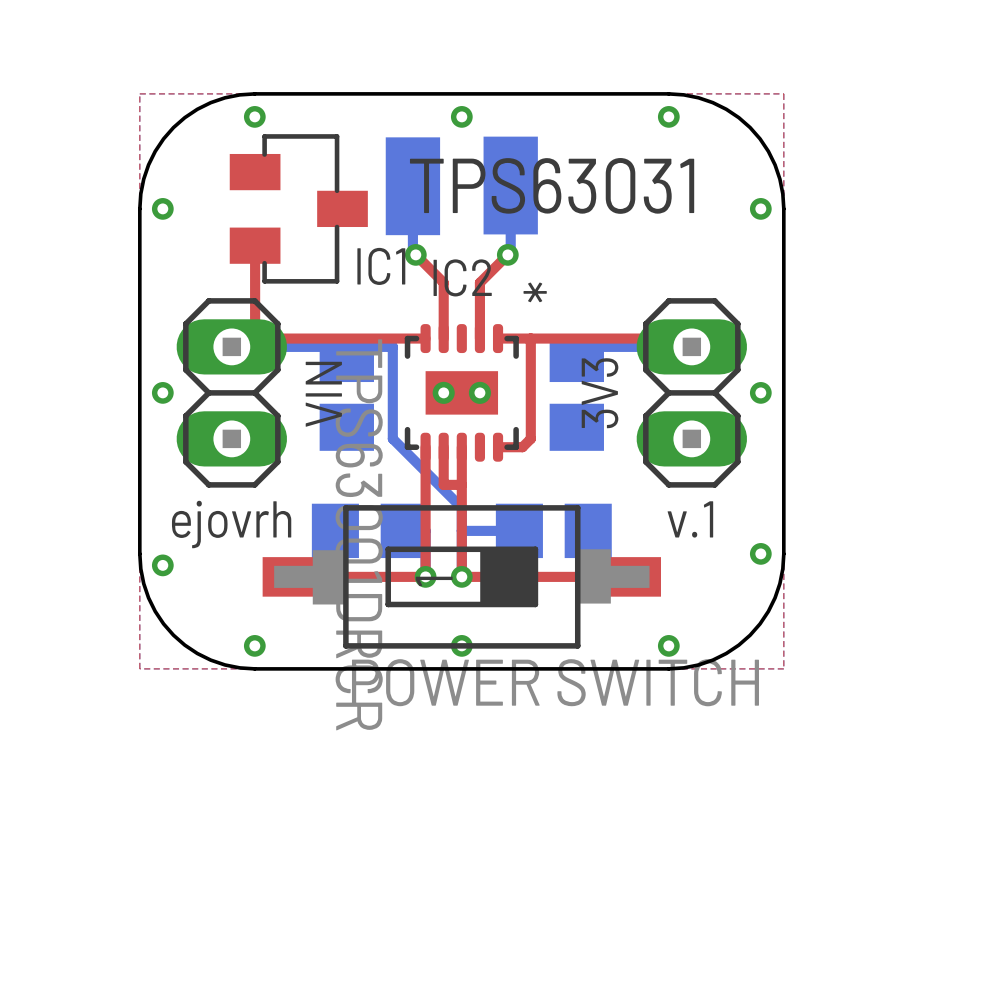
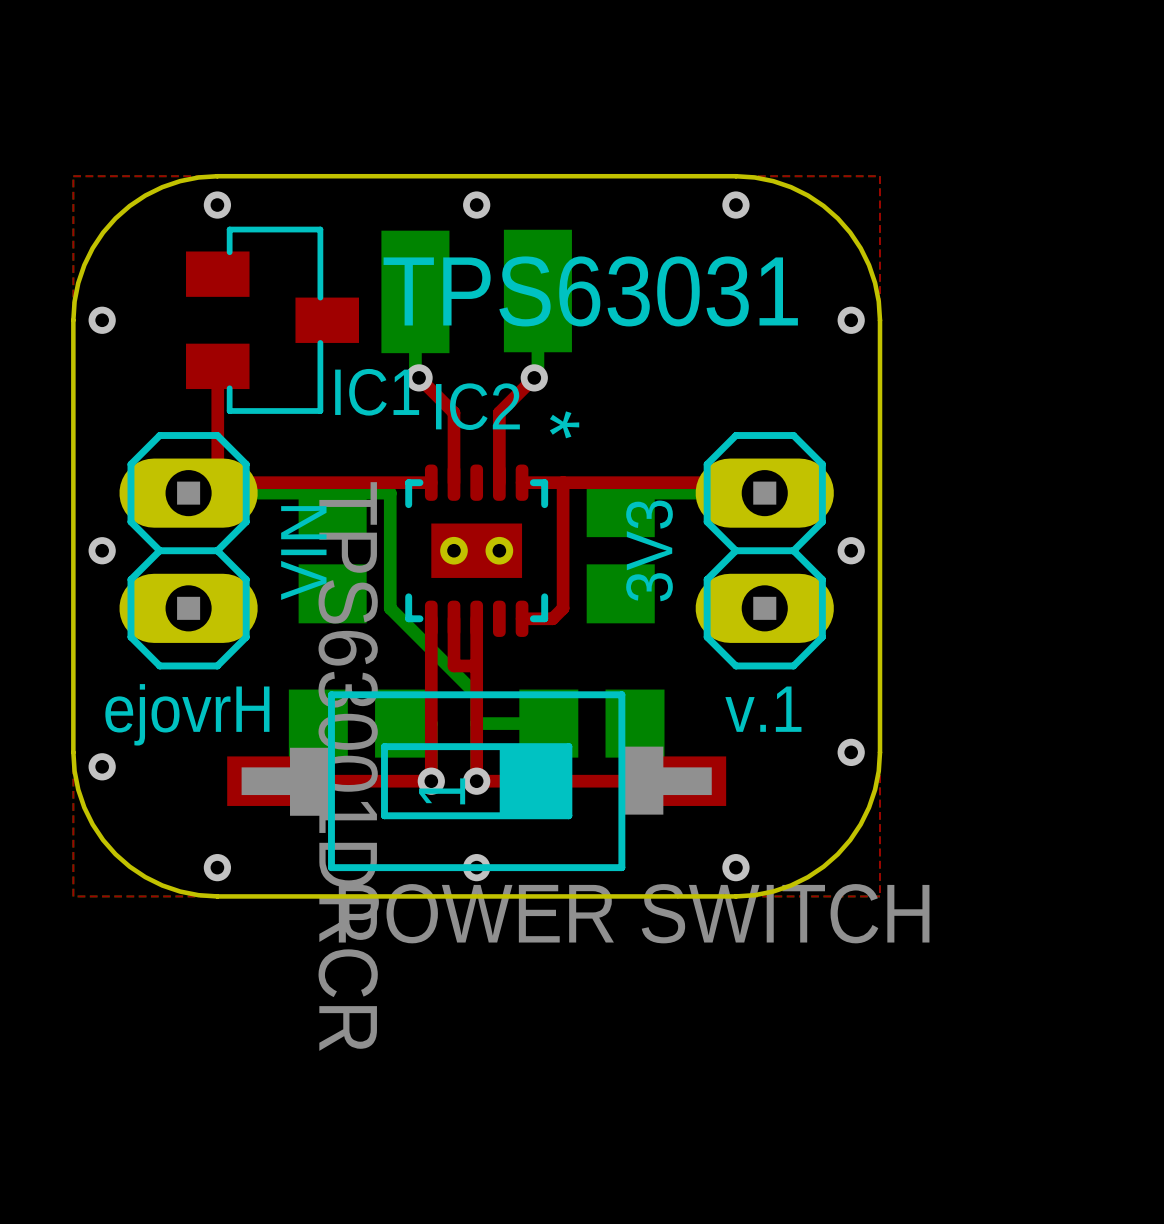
text: ejovrh (231, 524) -> ejovrH (187, 714)

